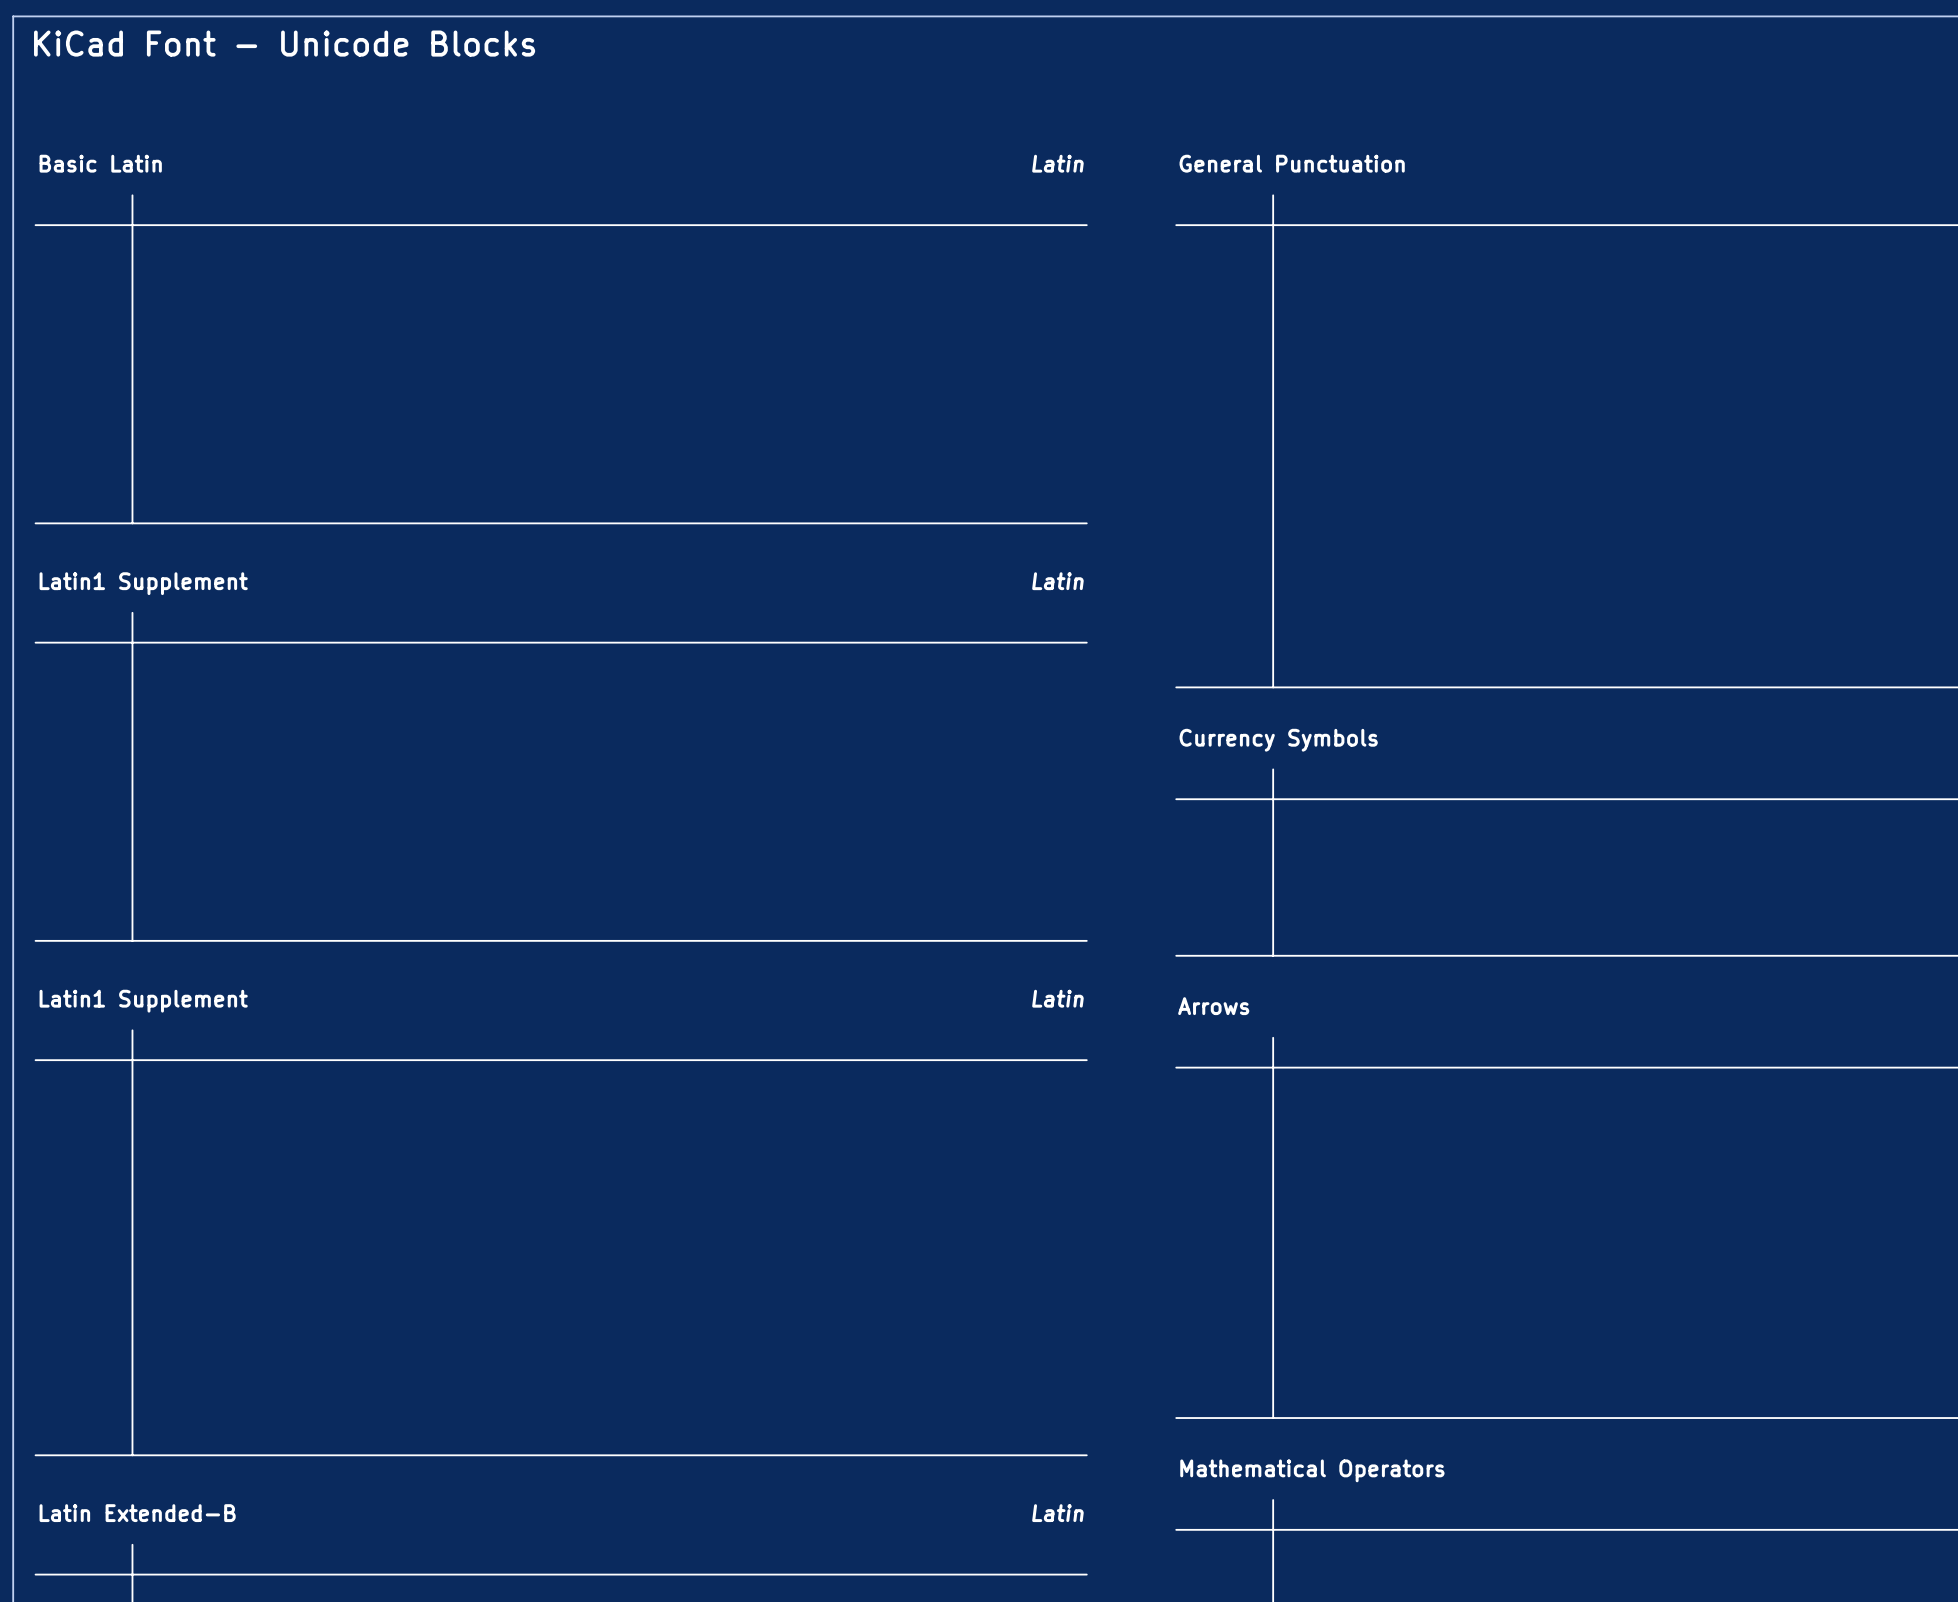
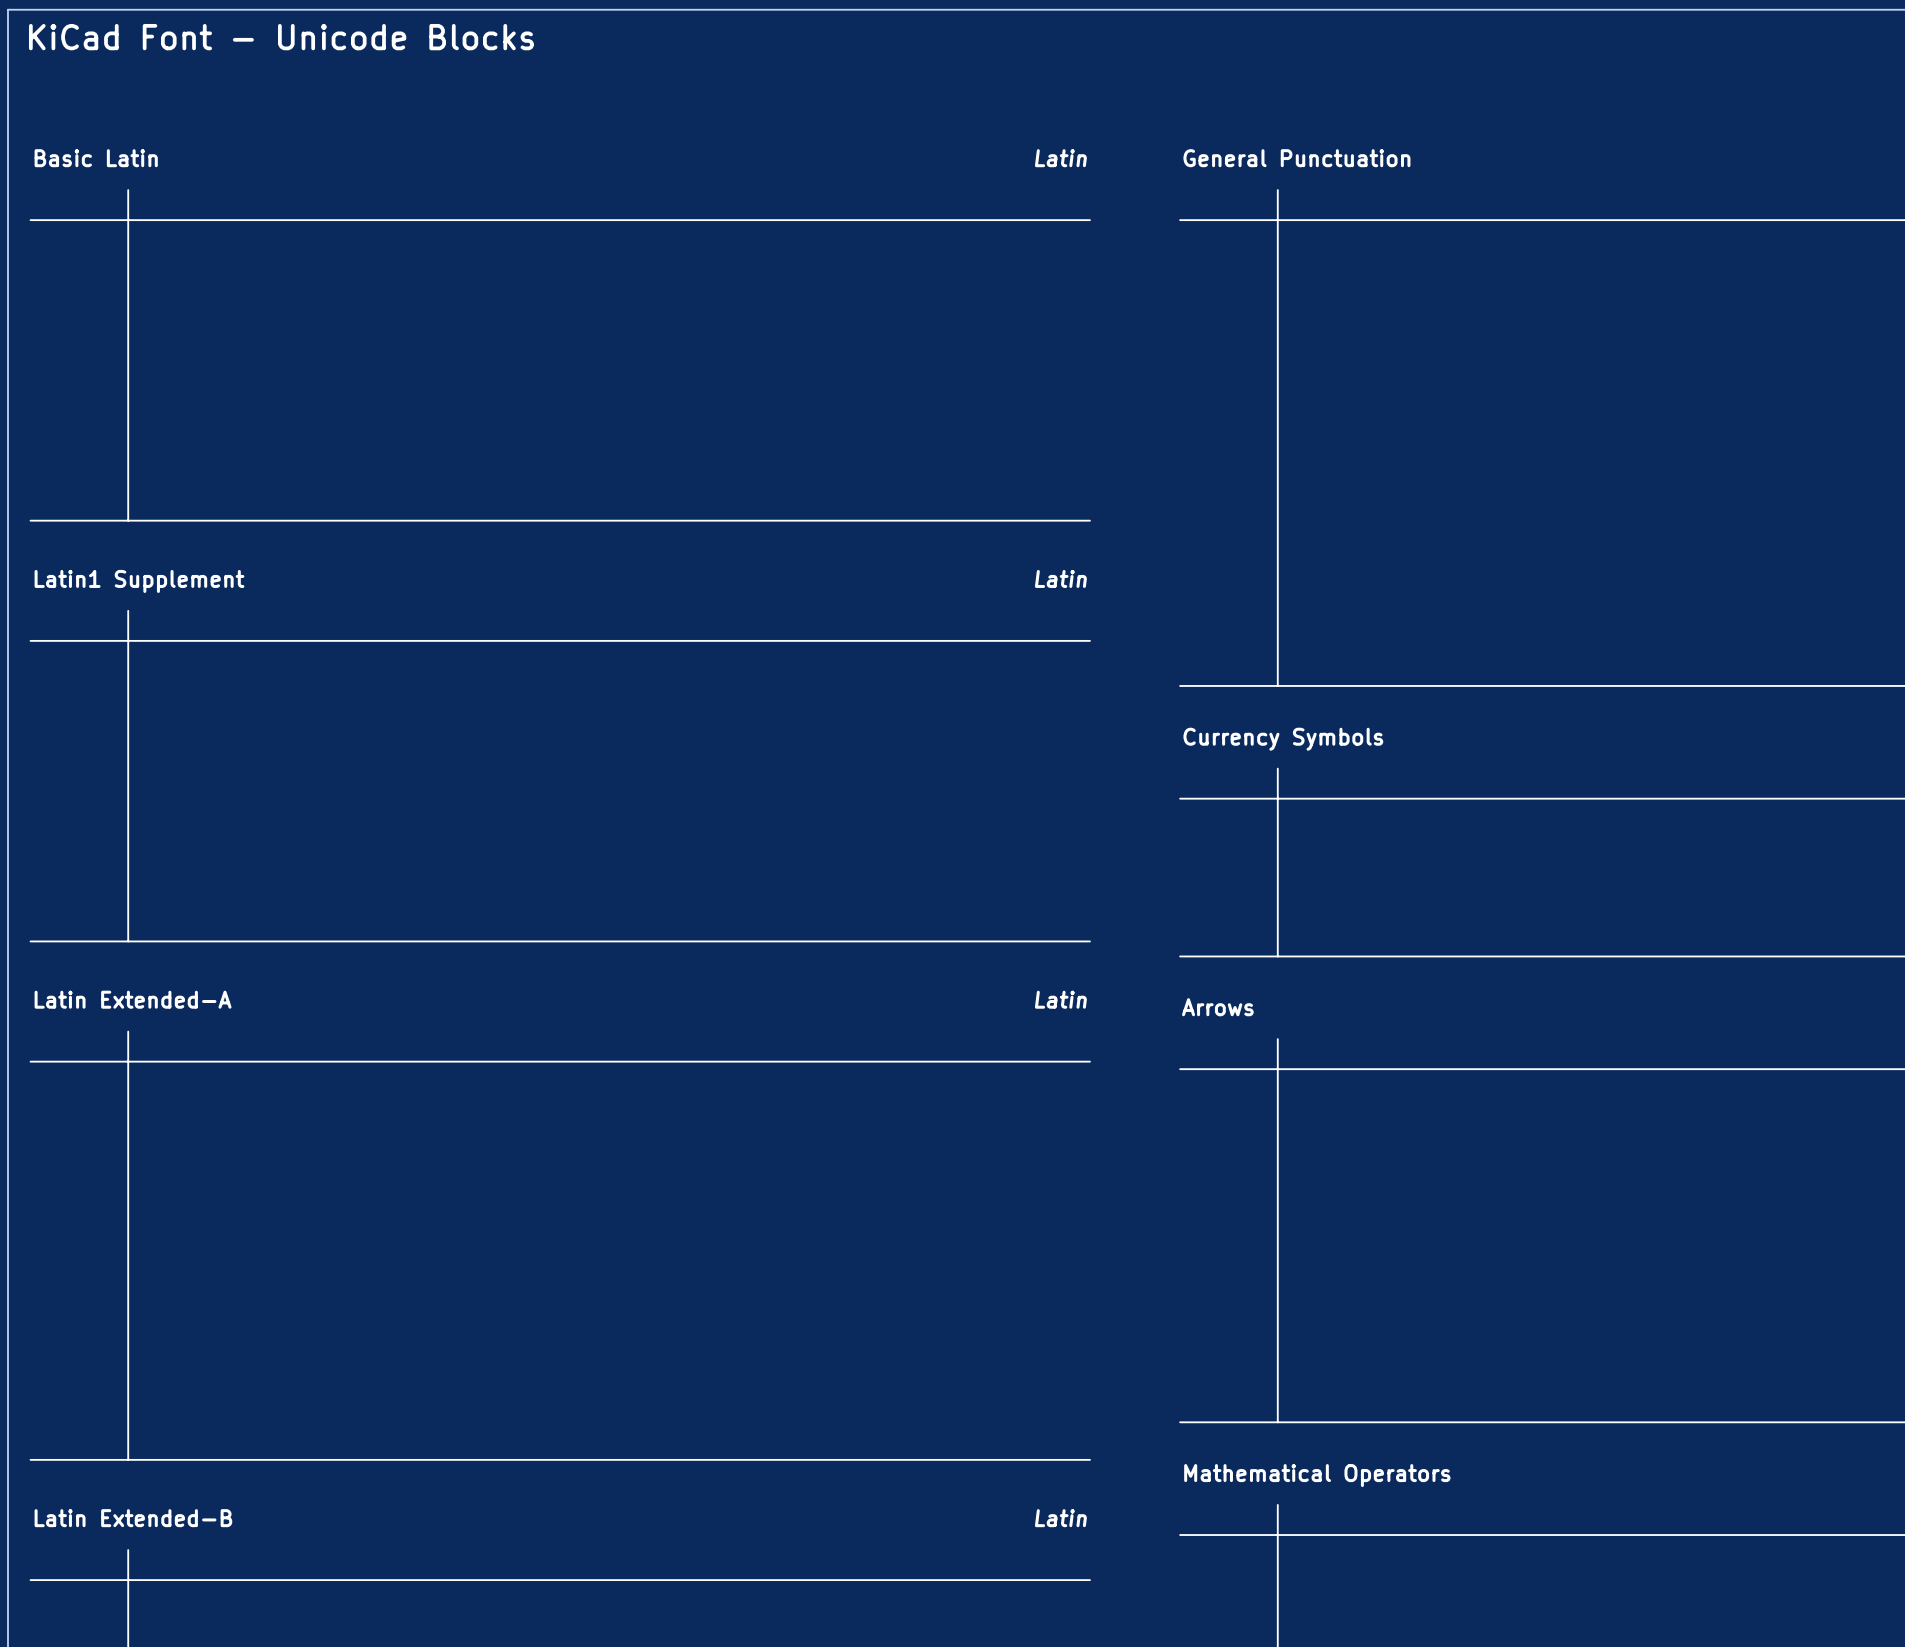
text: Latin1 Supplement (143, 1001) -> Latin Extended-A (133, 999)

